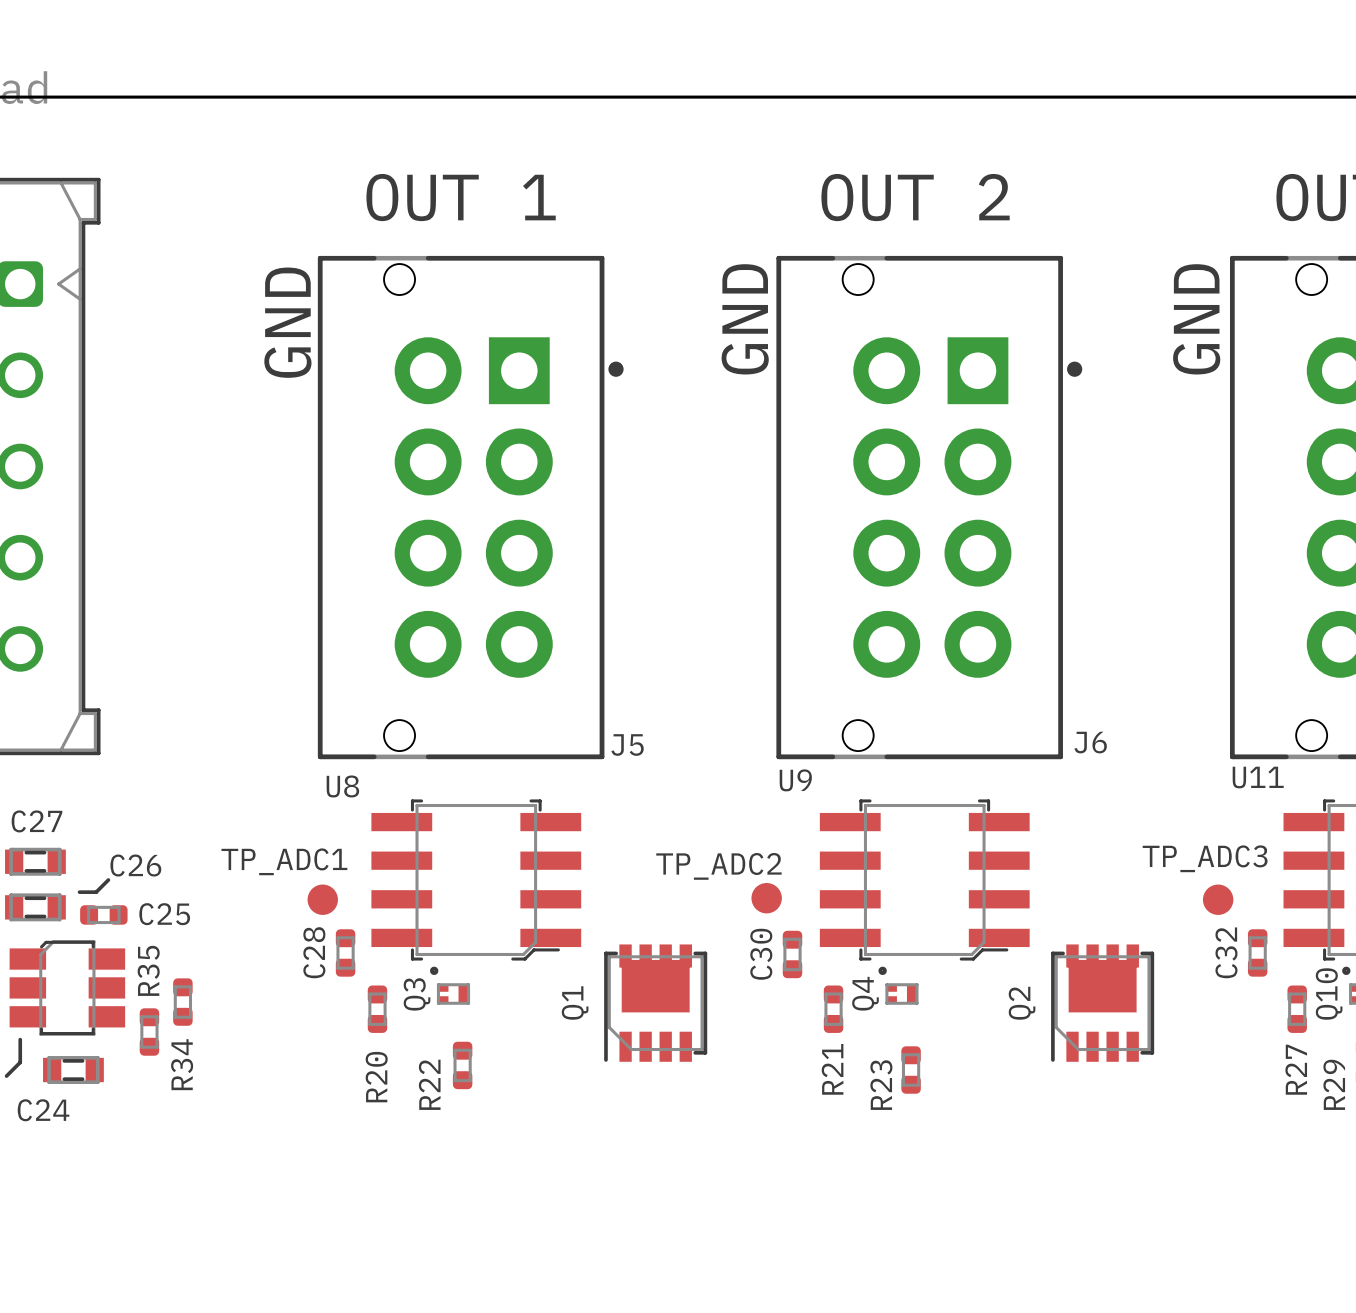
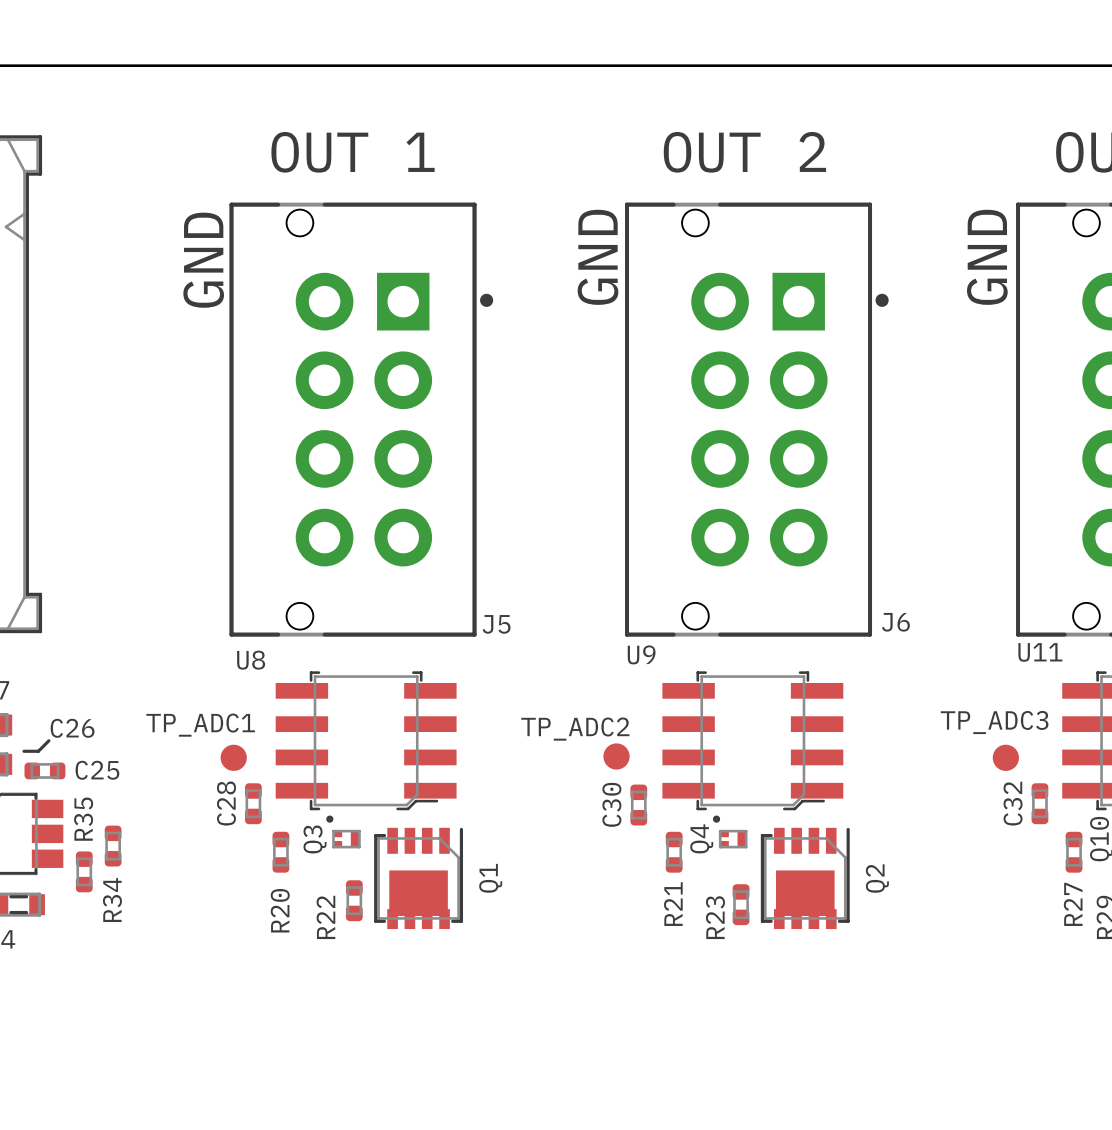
Q1 rotation: 0° (655, 1003) -> 180° (418, 878)
Q1 position: (655, 1003) -> (418, 878)
Q2 rotation: 0° (1102, 1003) -> 180° (805, 878)
Q2 position: (1102, 1003) -> (805, 878)

